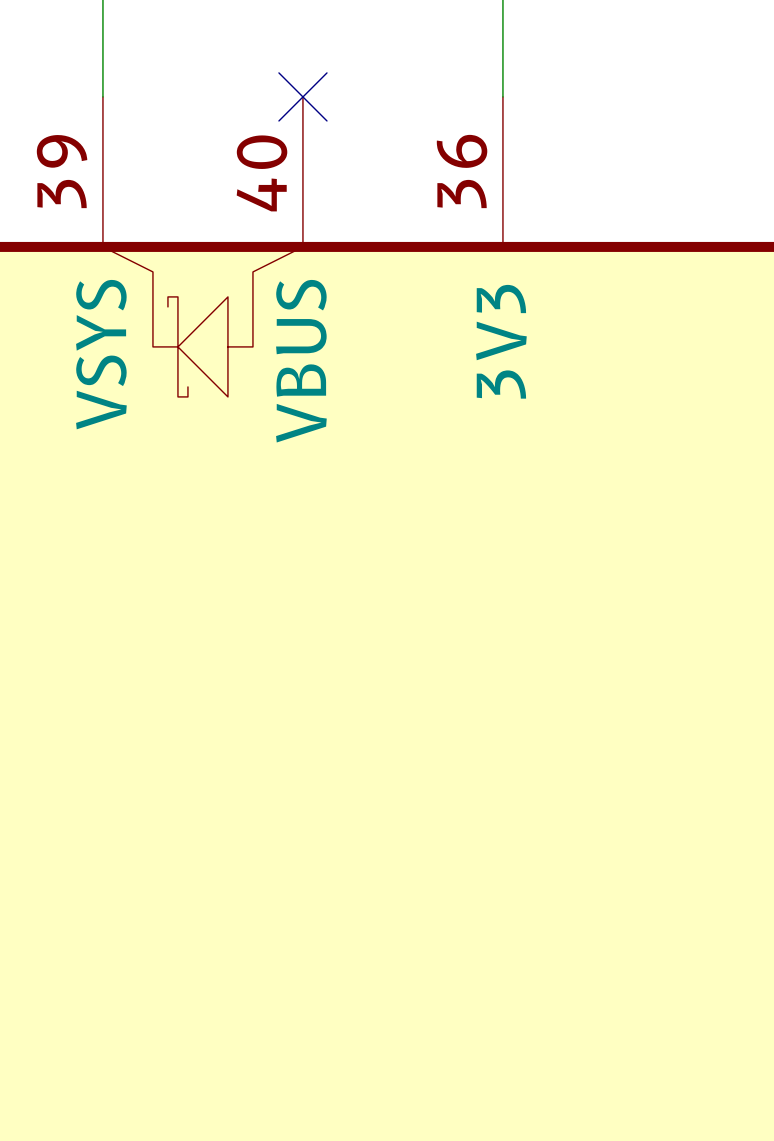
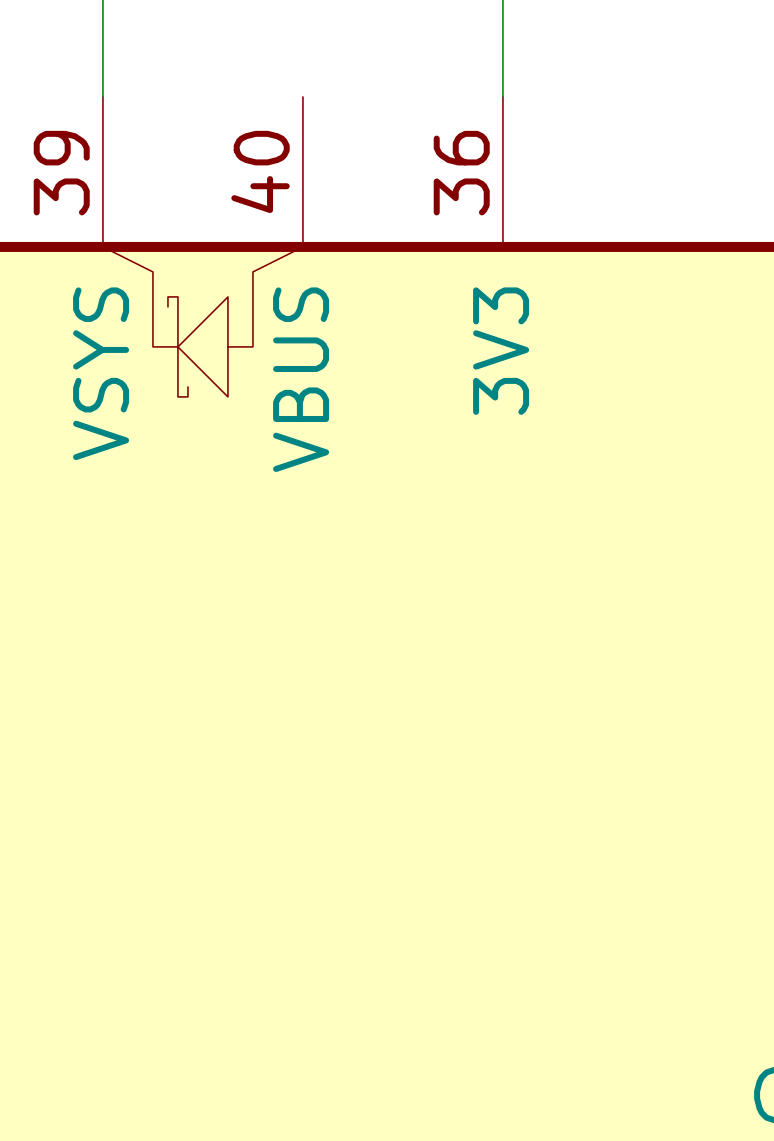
no-connect mark: (302, 96) -> none

